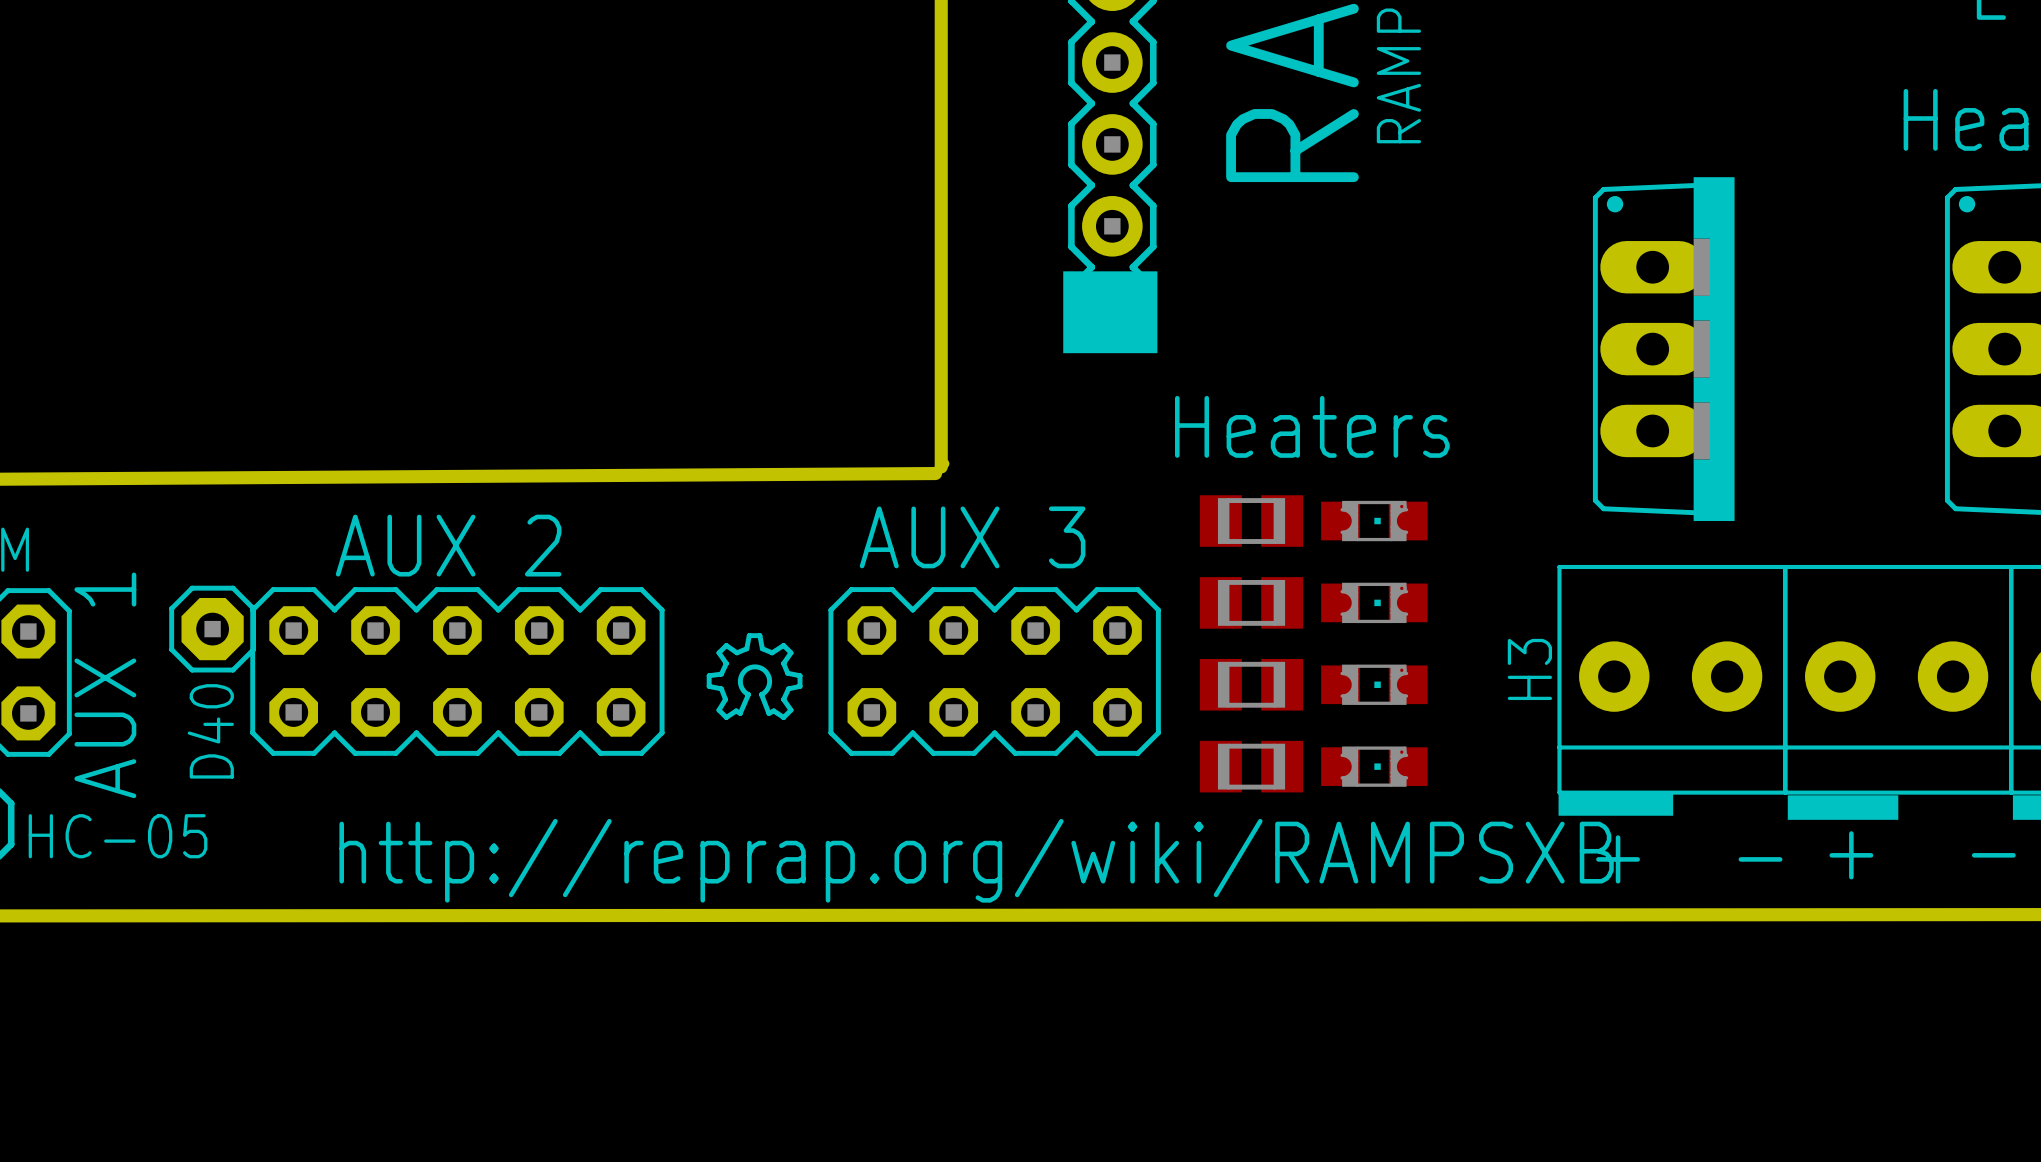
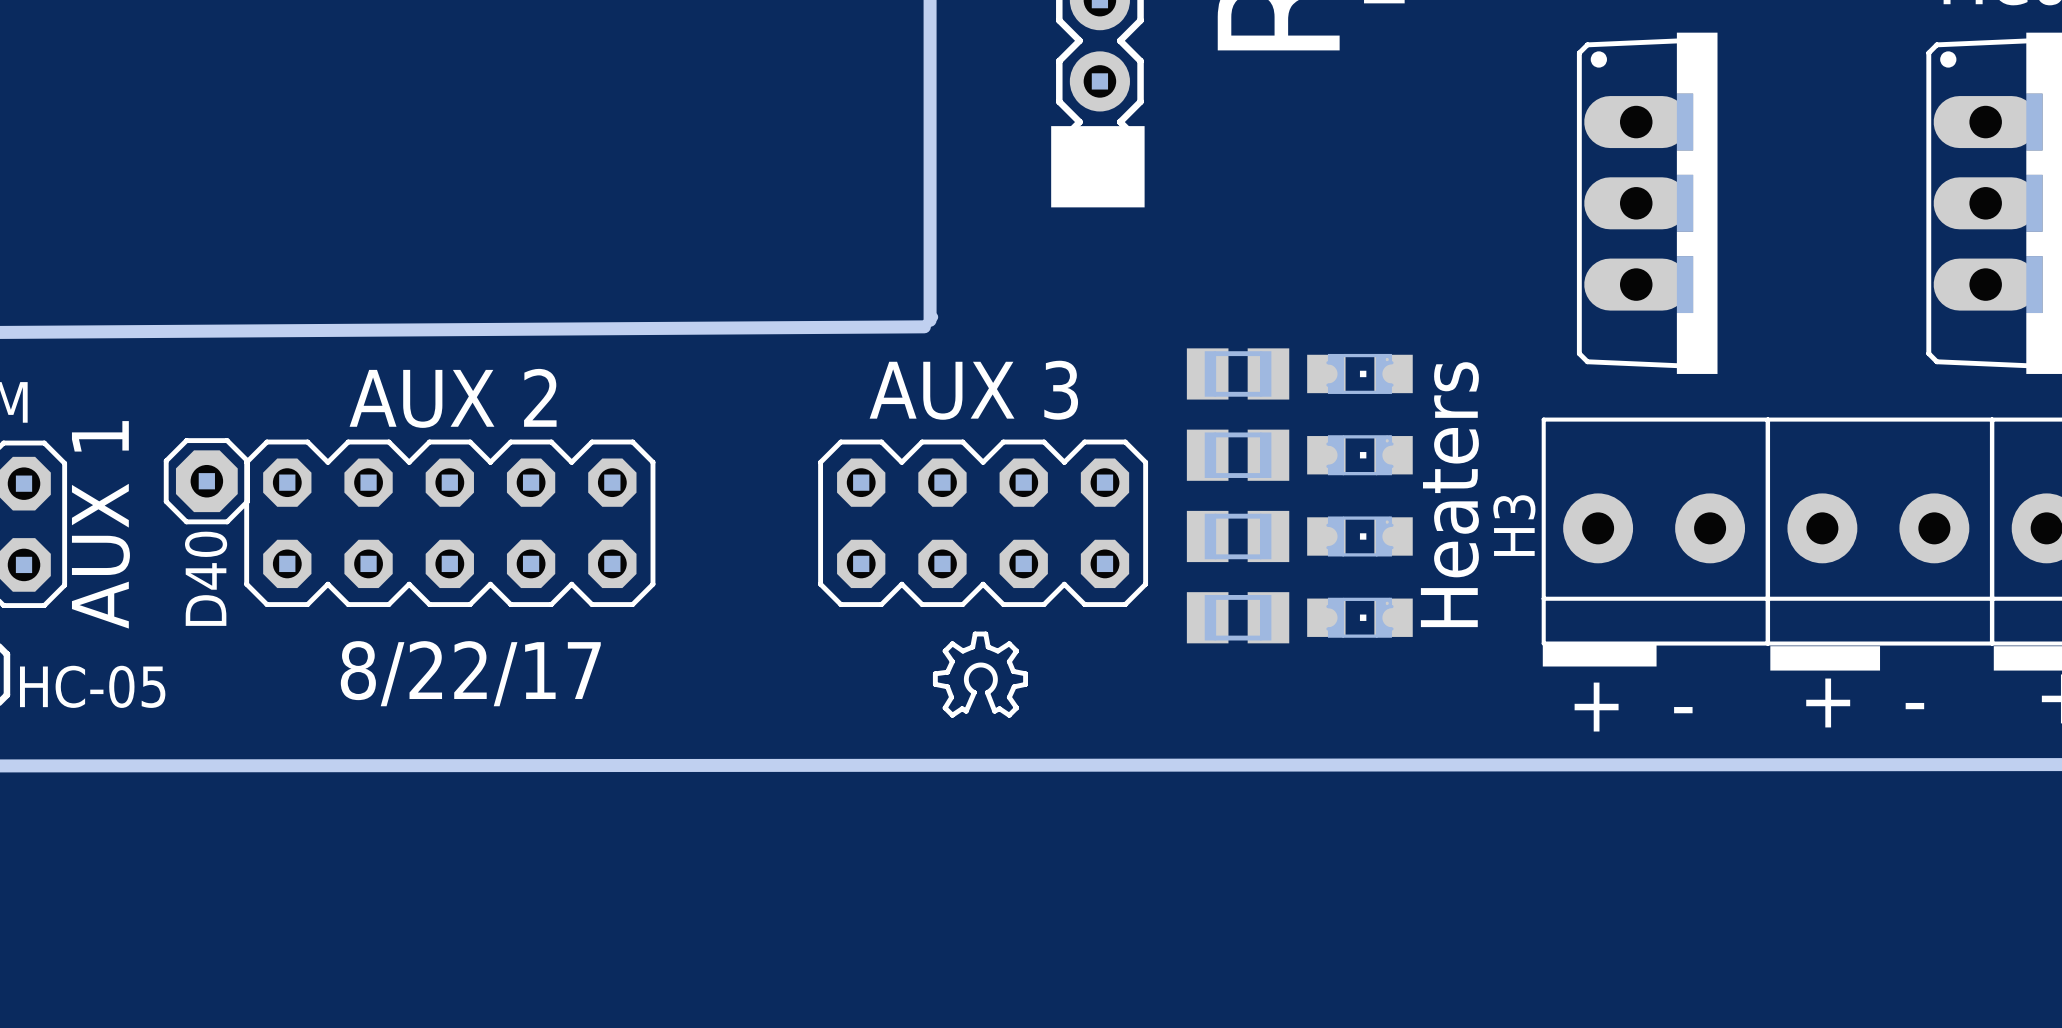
text rotation: 0° (1312, 426) -> 90° counterclockwise (1449, 494)
drawing position: (754, 676) -> (980, 674)
text: none -> 8/22/17 (470, 673)
text: http://reprap.org/wiki/RAMPSXB (976, 860) -> none

